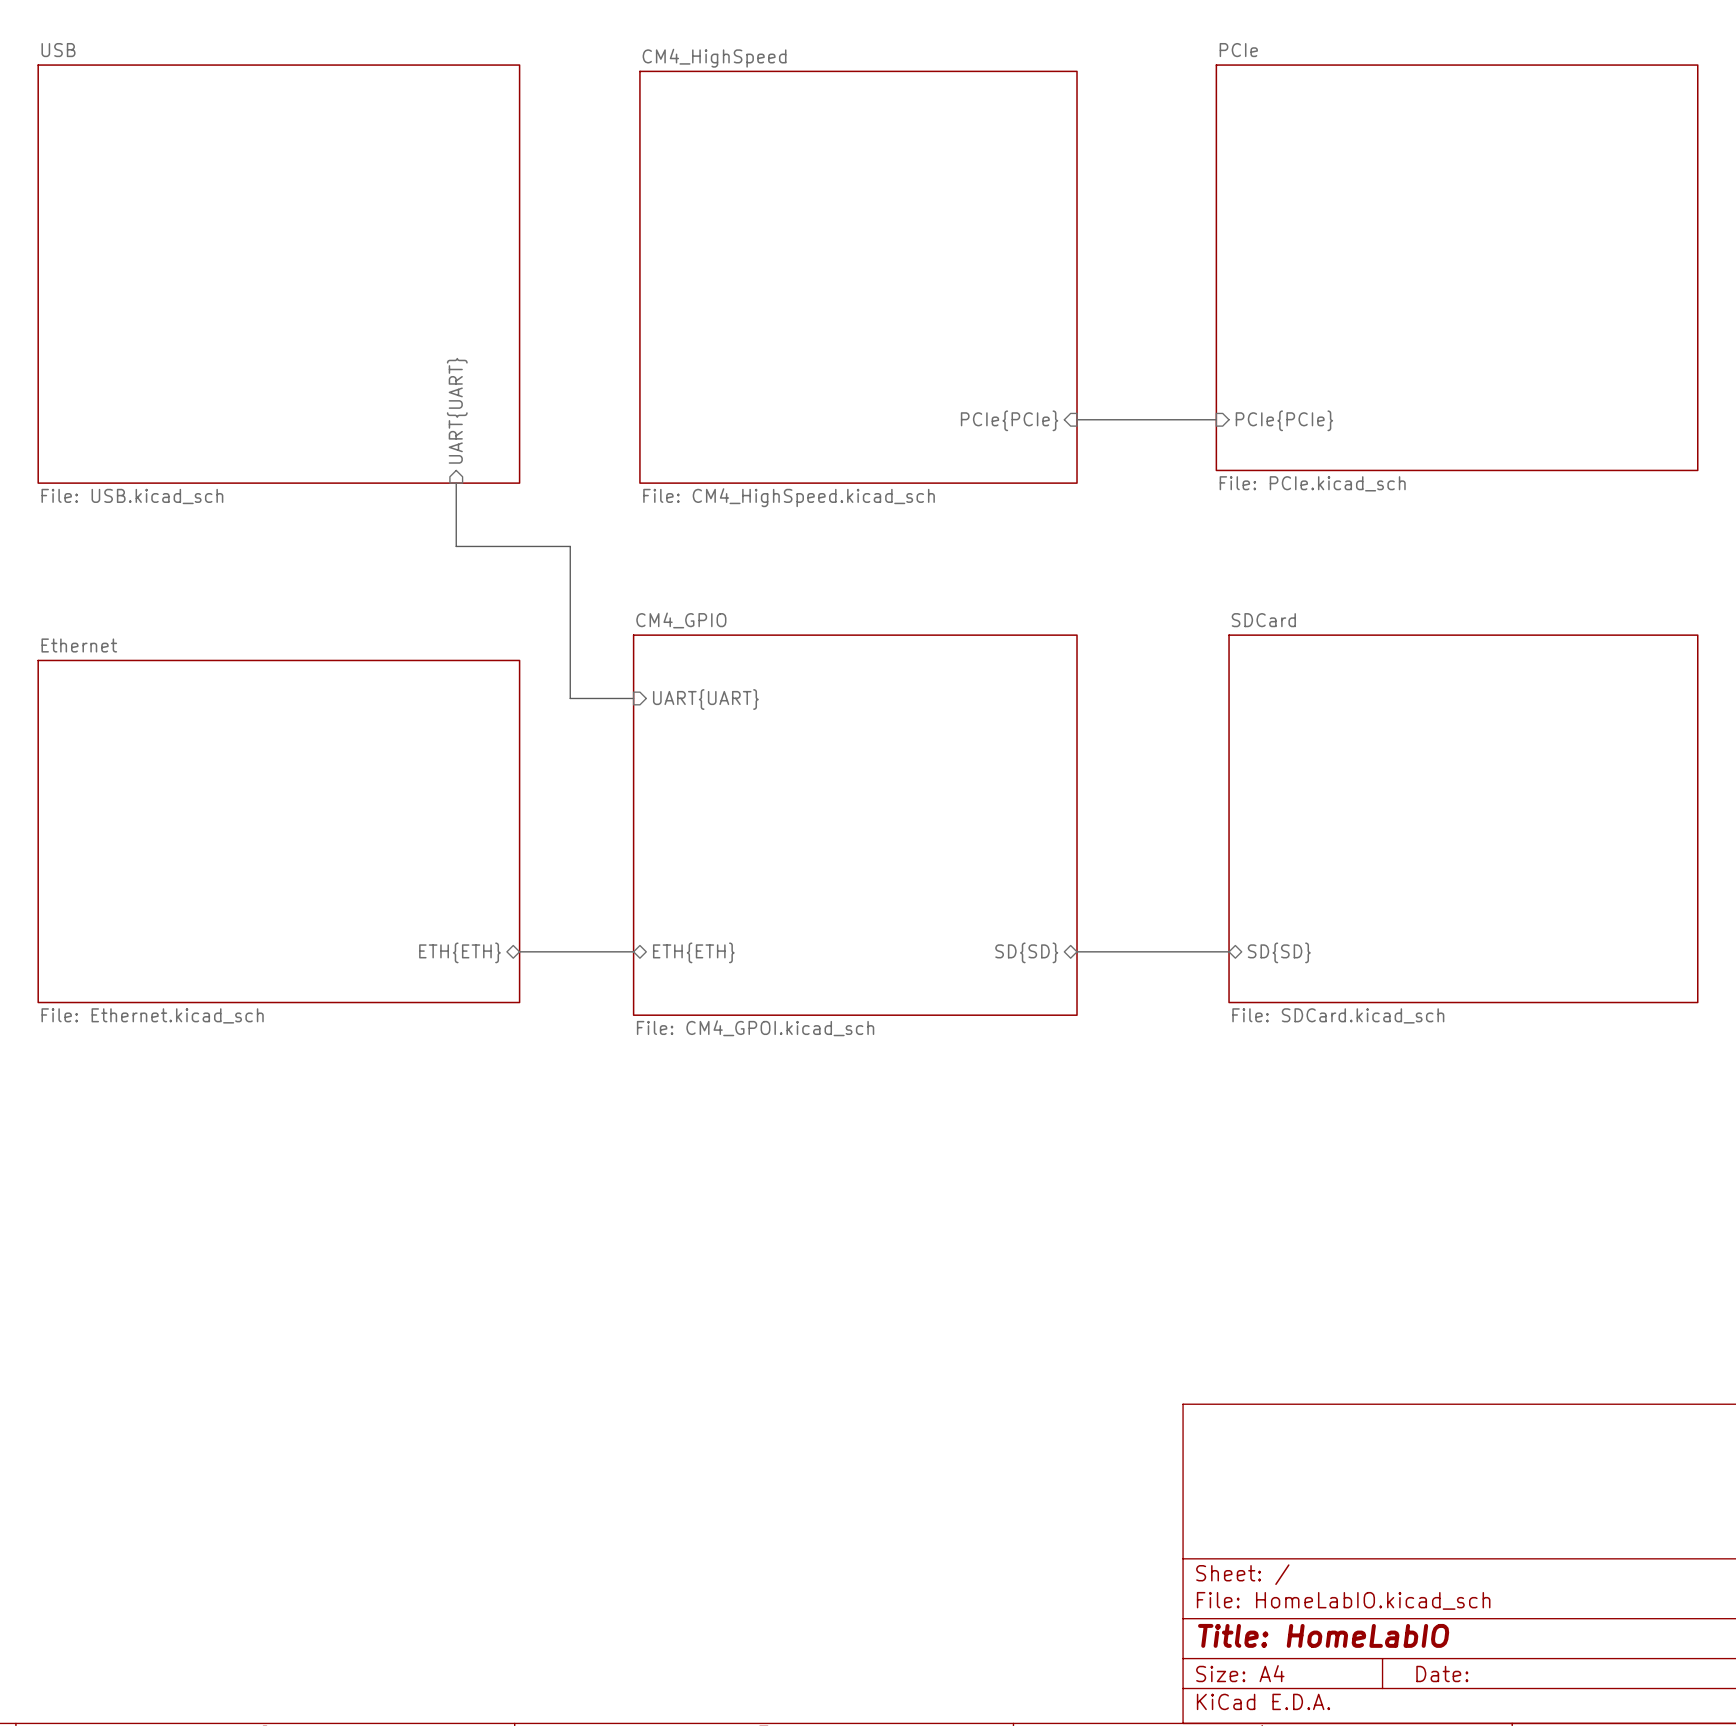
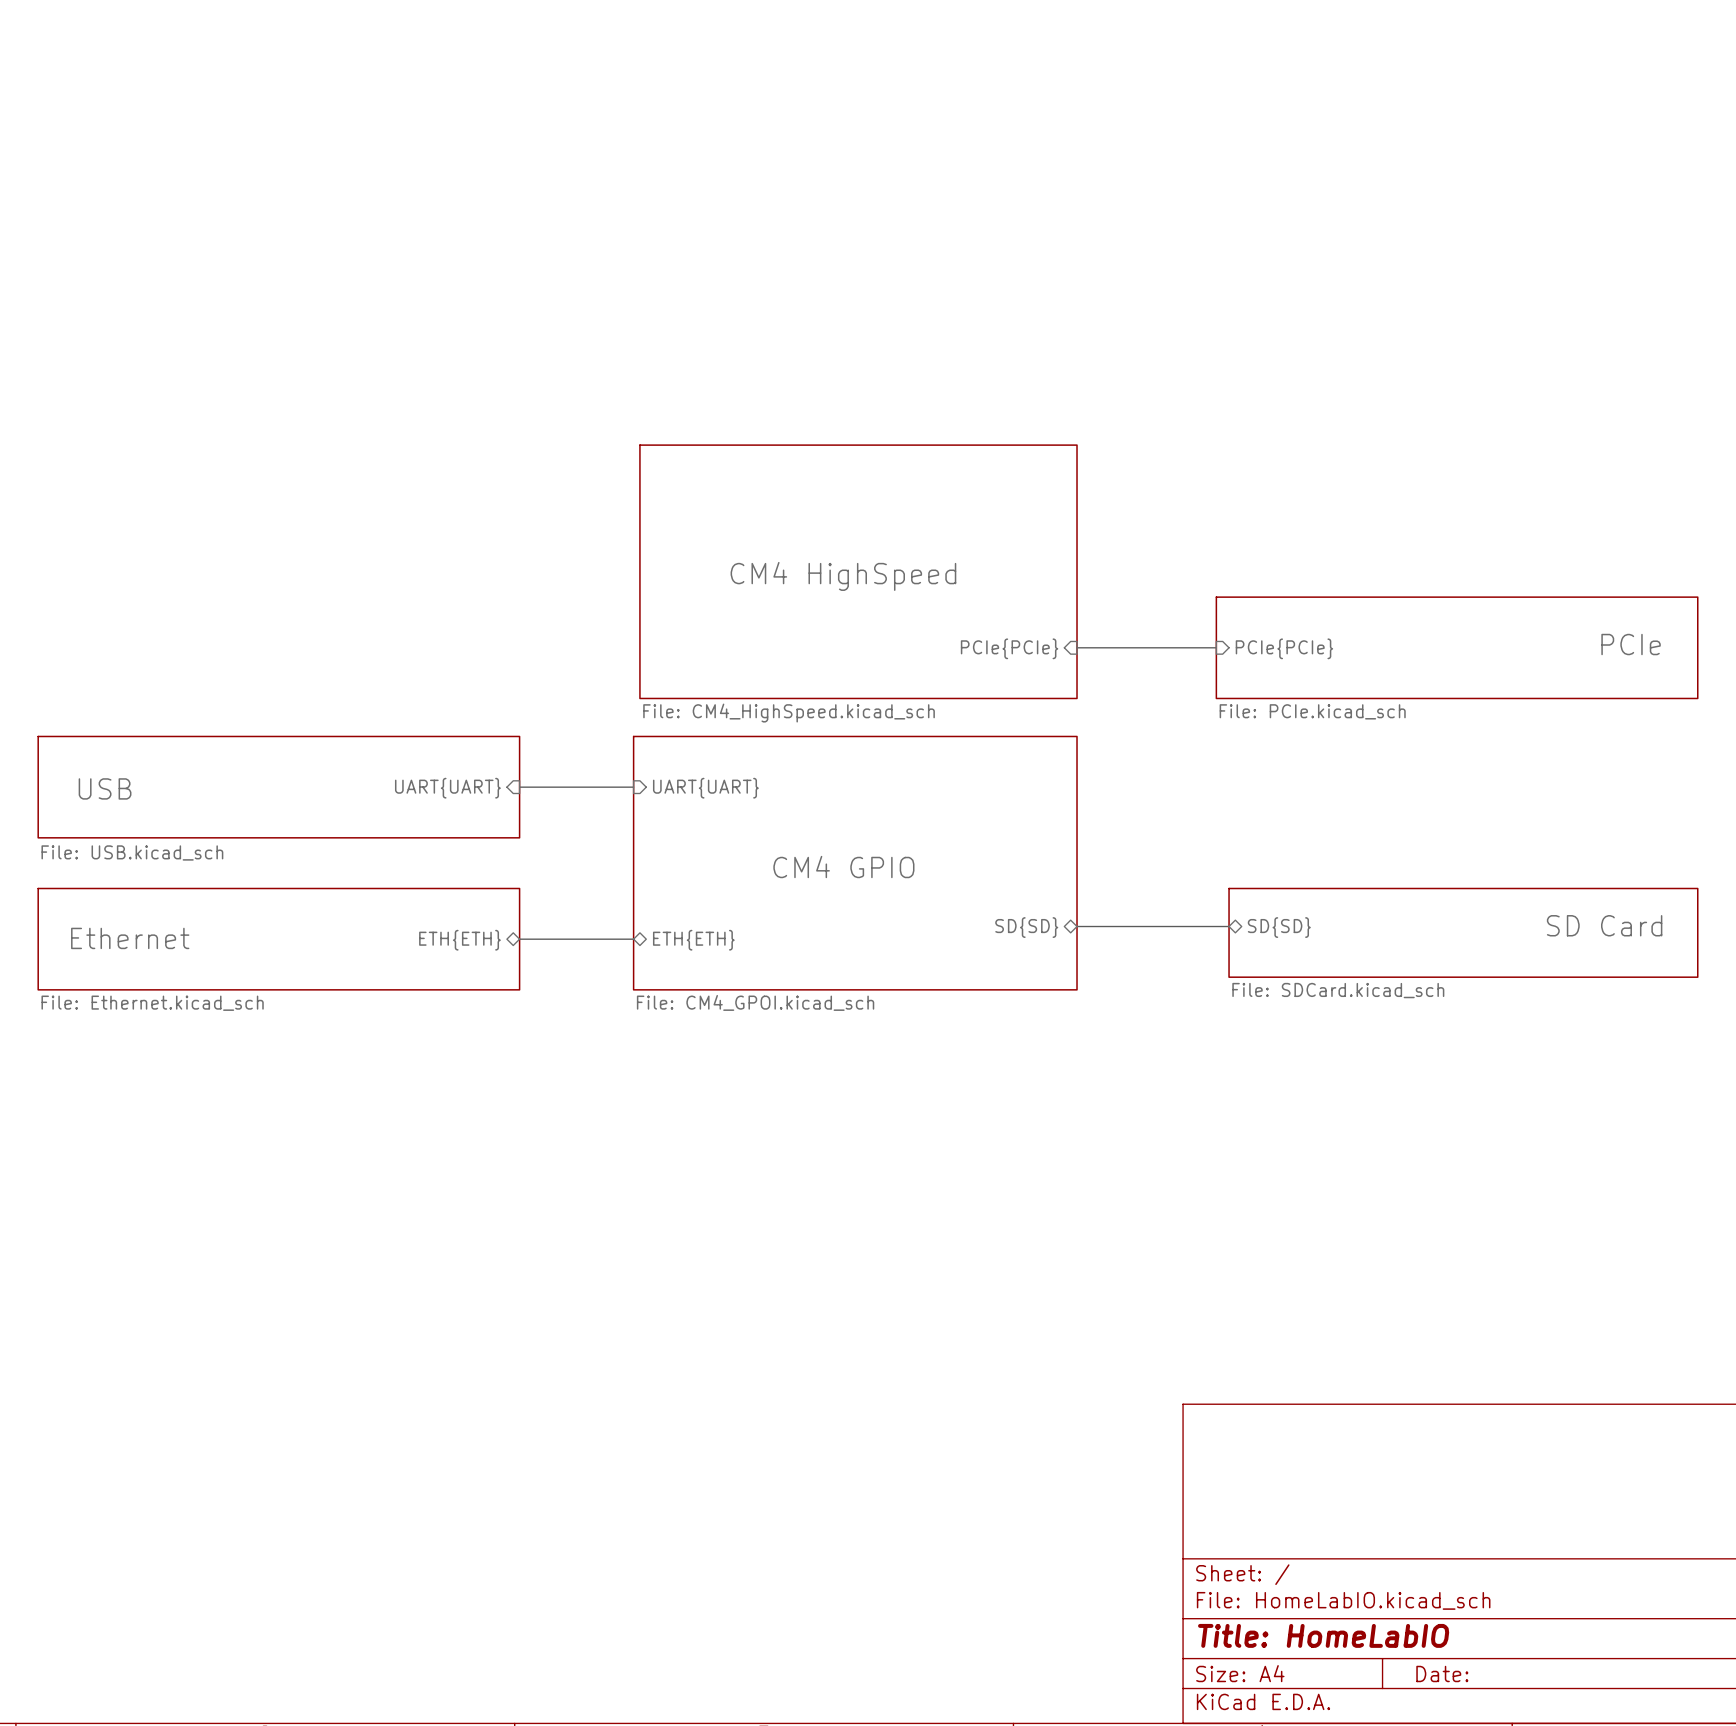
sheet PCIe: File: PCIe.kicad_sch (1457, 267) -> none
sheet USB: File: USB.kicad_sch (278, 274) -> none
sheet CM4_HighSpeed: File: CM4_HighSpeed.kicad_sch (858, 277) -> none
sheet pin: UART{UART} (457, 410) -> none
bus: (1077, 419) (1216, 419) -> (1077, 647) (1216, 647)
sheet pin: PCIe{PCIe} (1009, 420) -> none
sheet pin: PCIe{PCIe} (1284, 420) -> none
bus: (456, 483) (456, 546) (570, 546) (570, 698) (633, 698) -> none
sheet CM4 HighSpeed: none -> File: CM4_HighSpeed.kicad_sch (858, 571)
sheet PCIe: none -> File: PCIe.kicad_sch (1457, 647)
sheet pin: none -> PCIe{PCIe} (1009, 648)
sheet pin: none -> PCIe{PCIe} (1284, 648)
sheet pin: UART{UART} (705, 699) -> none
sheet USB: none -> File: USB.kicad_sch (278, 787)
bus: none -> (519, 787) (633, 787)
sheet pin: none -> UART{UART} (447, 788)
sheet pin: none -> UART{UART} (705, 788)
sheet SDCard: File: SDCard.kicad_sch (1463, 818) -> none
sheet CM4_GPIO: File: CM4_GPOI.kicad_sch (855, 825) -> none
sheet Ethernet: File: Ethernet.kicad_sch (278, 831) -> none
sheet CM4 GPIO: none -> File: CM4_GPOI.kicad_sch (855, 863)
sheet SD Card: none -> File: SDCard.kicad_sch (1463, 932)
sheet Ethernet: none -> File: Ethernet.kicad_sch (278, 939)
bus: (519, 951) (633, 951) -> (519, 939) (633, 939)
bus: (1077, 951) (1229, 951) -> (1077, 926) (1229, 926)
sheet pin position: ETH{ETH} (459, 952) -> ETH{ETH} (459, 940)
sheet pin position: ETH{ETH} (693, 952) -> ETH{ETH} (693, 940)
sheet pin position: SD{SD} (1026, 952) -> SD{SD} (1026, 927)
sheet pin position: SD{SD} (1279, 952) -> SD{SD} (1279, 927)

